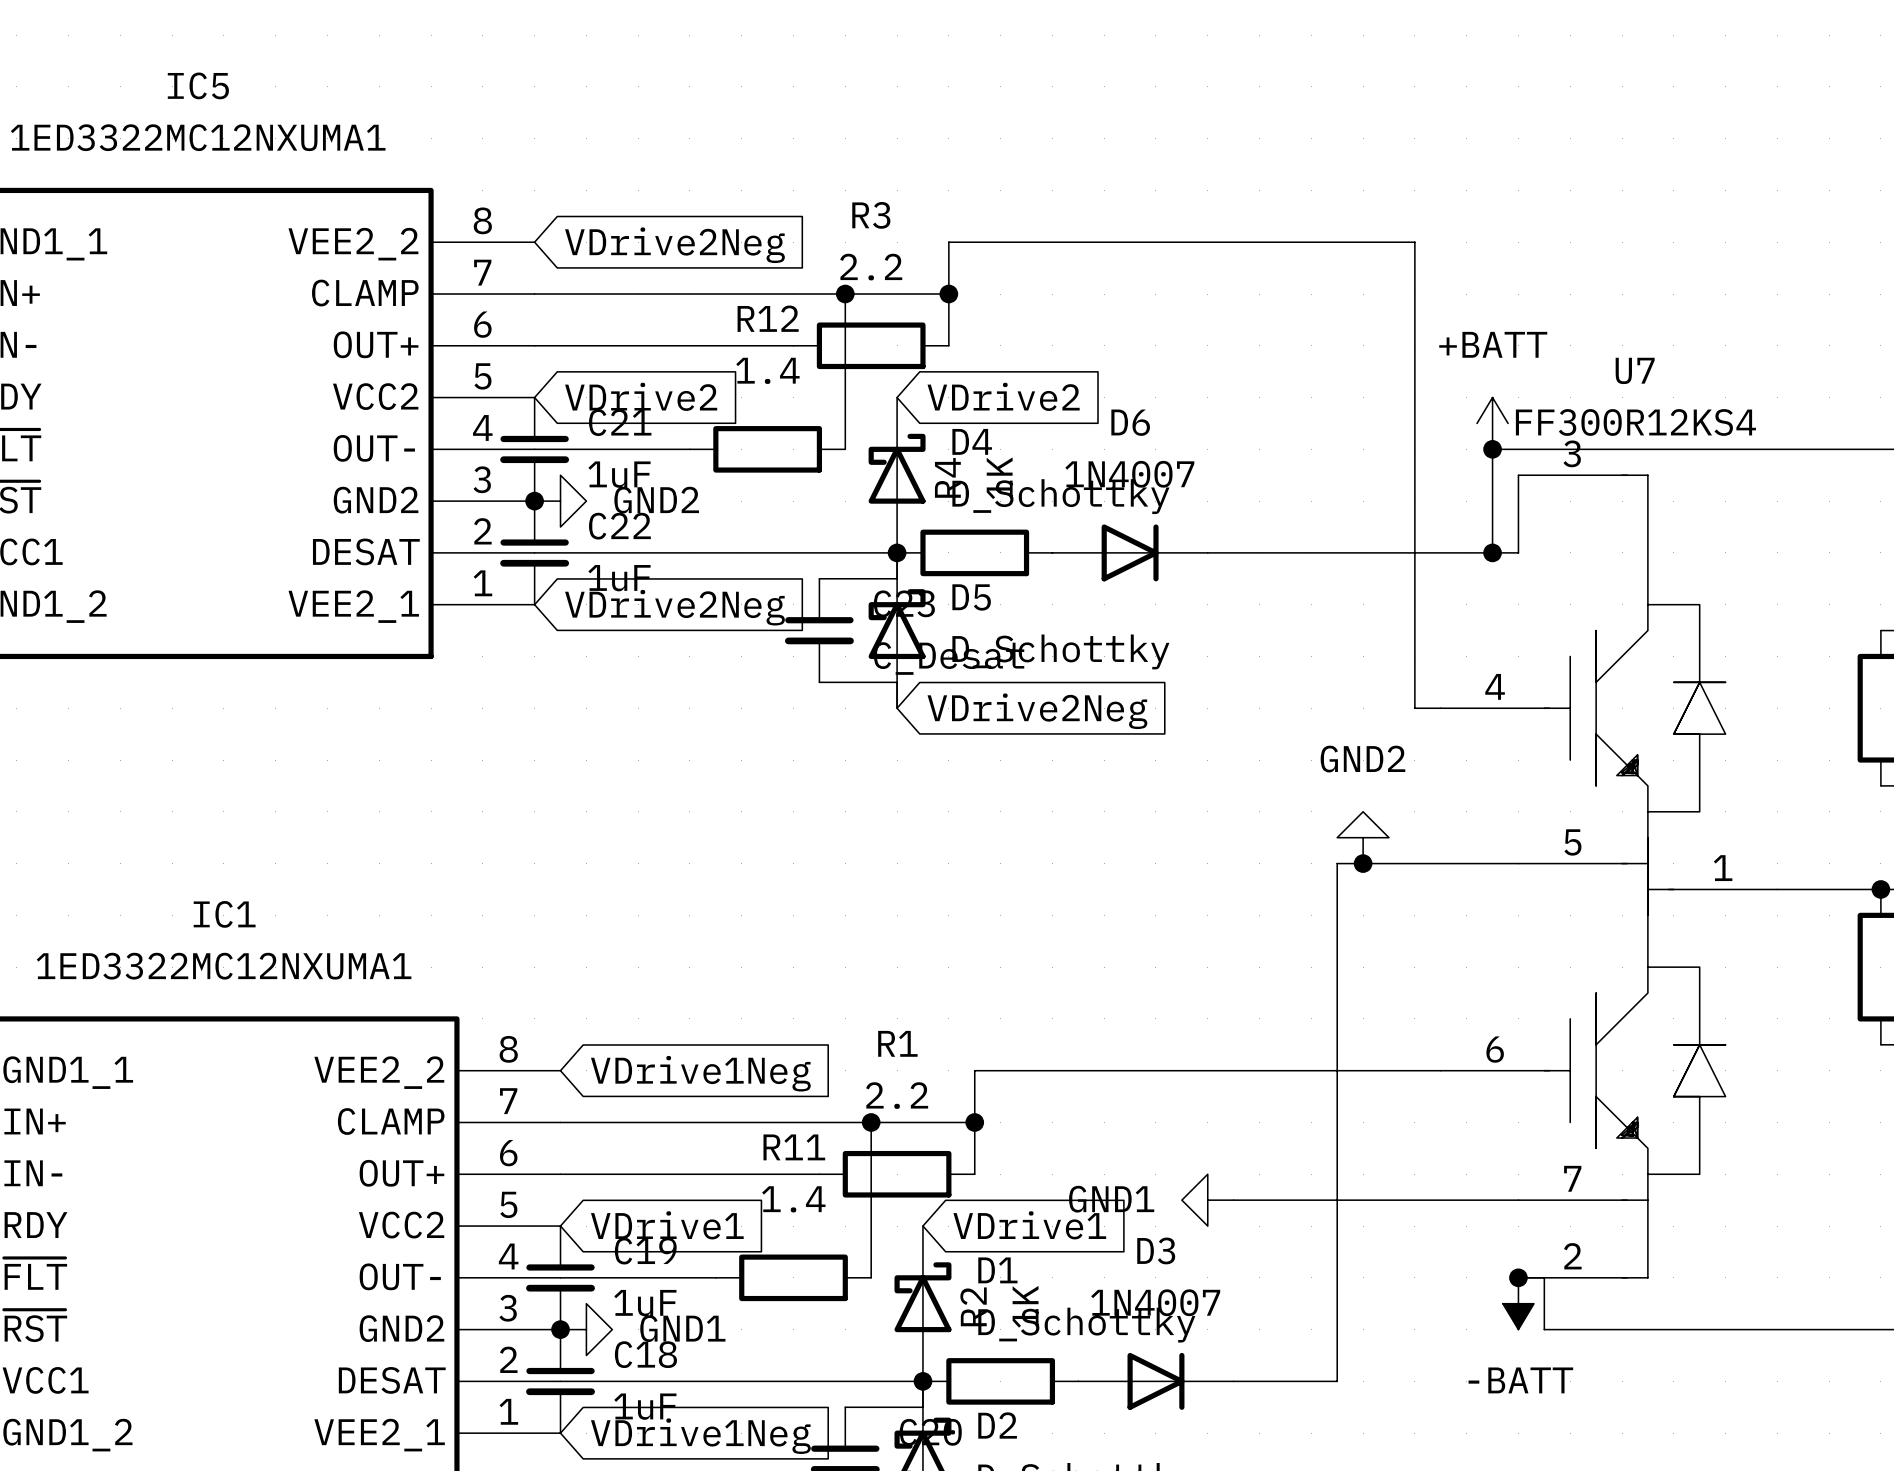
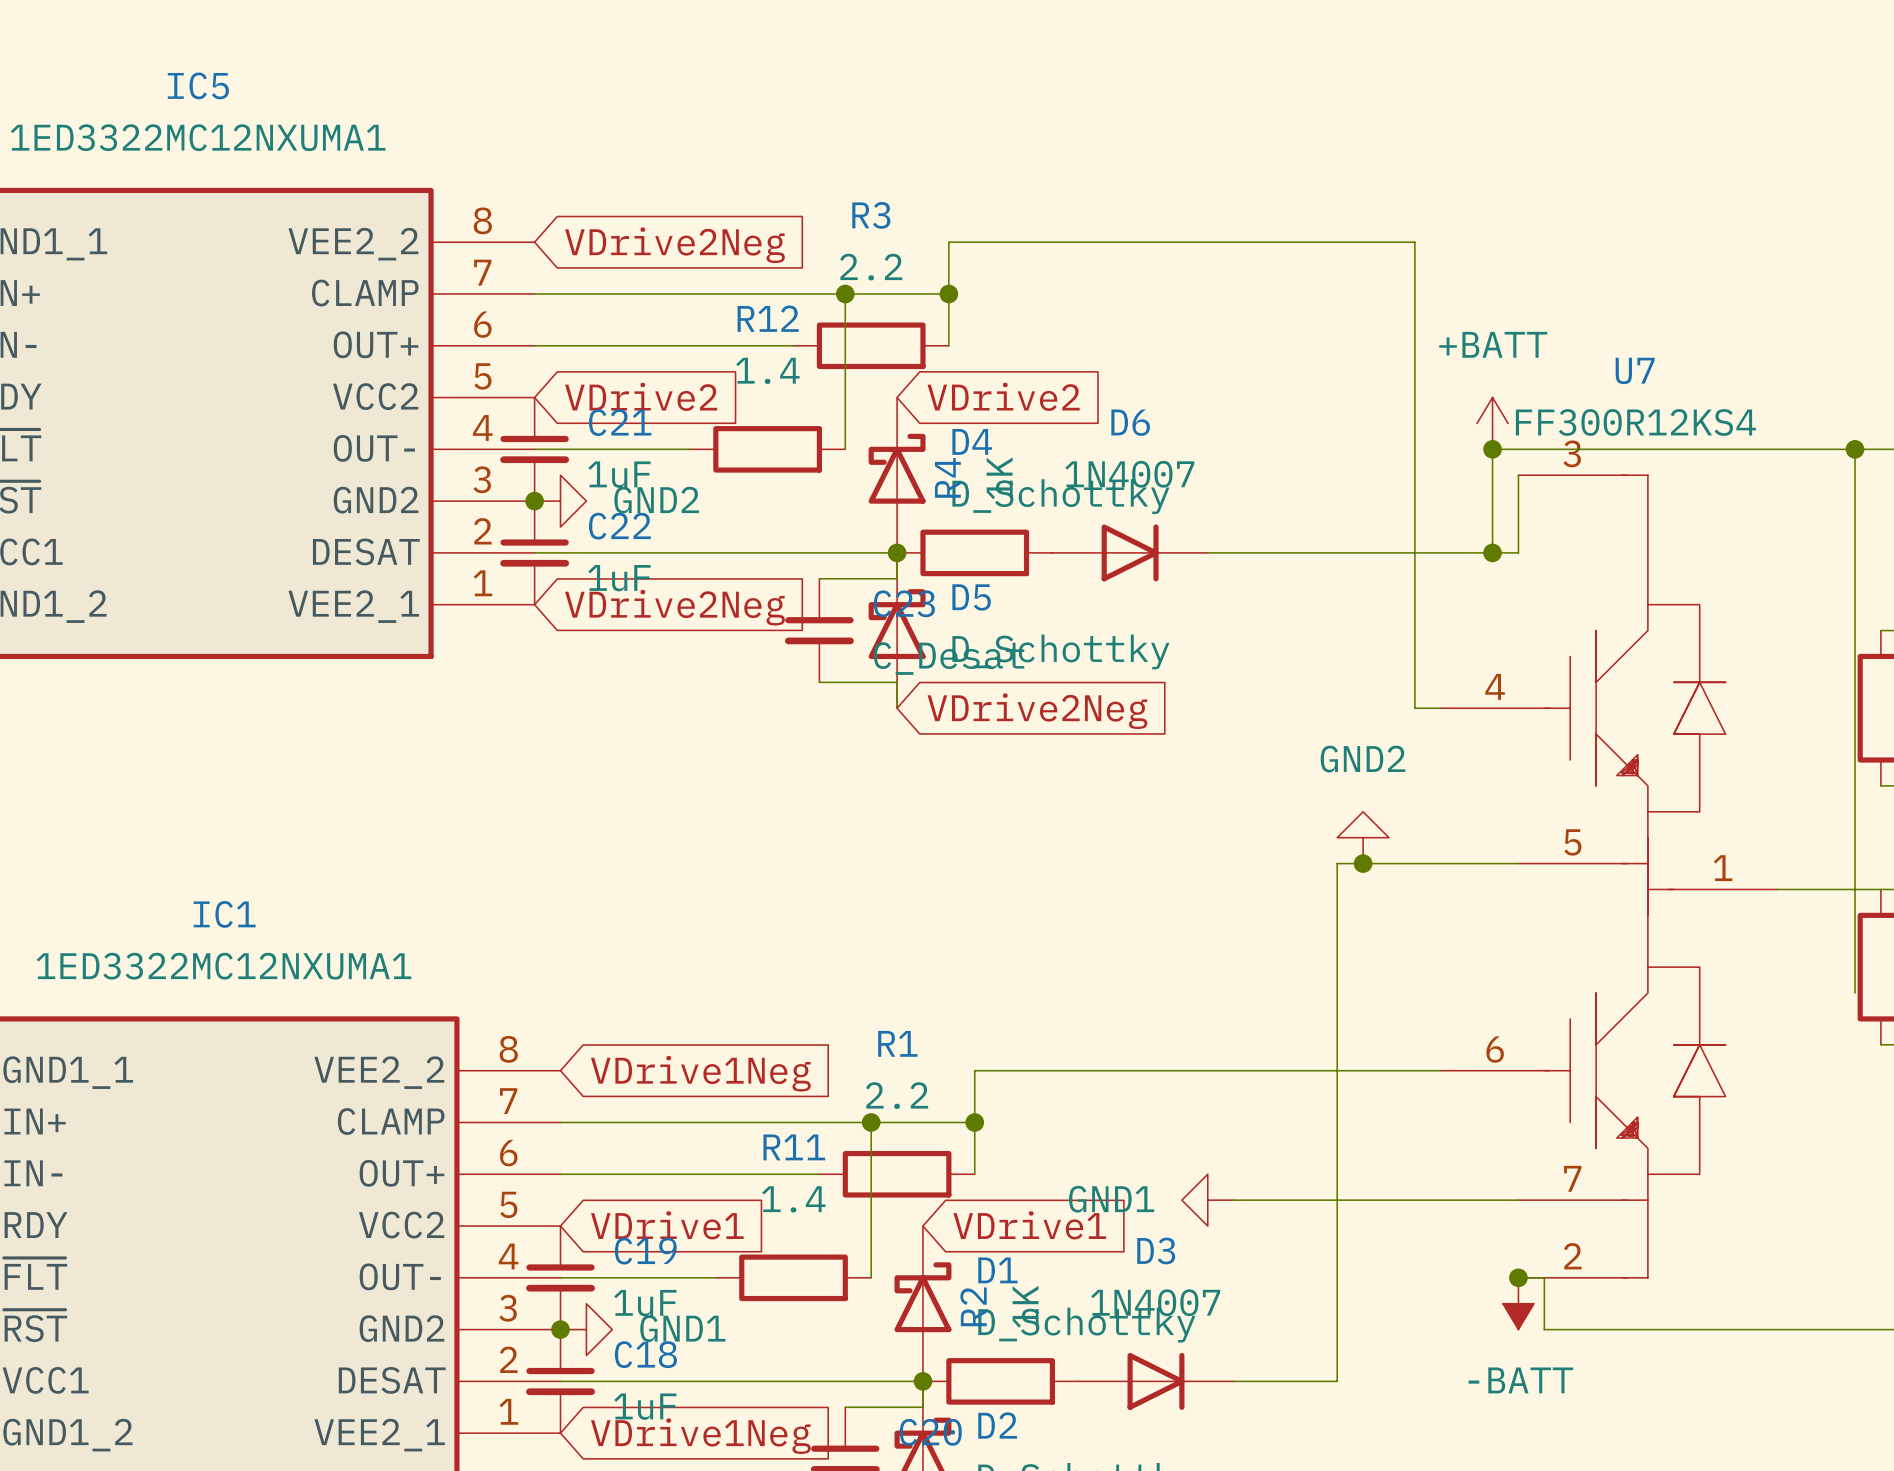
wire: none -> (1855, 449) (1855, 993)
junction: none -> (1855, 449)
junction: (1880, 889) -> none

